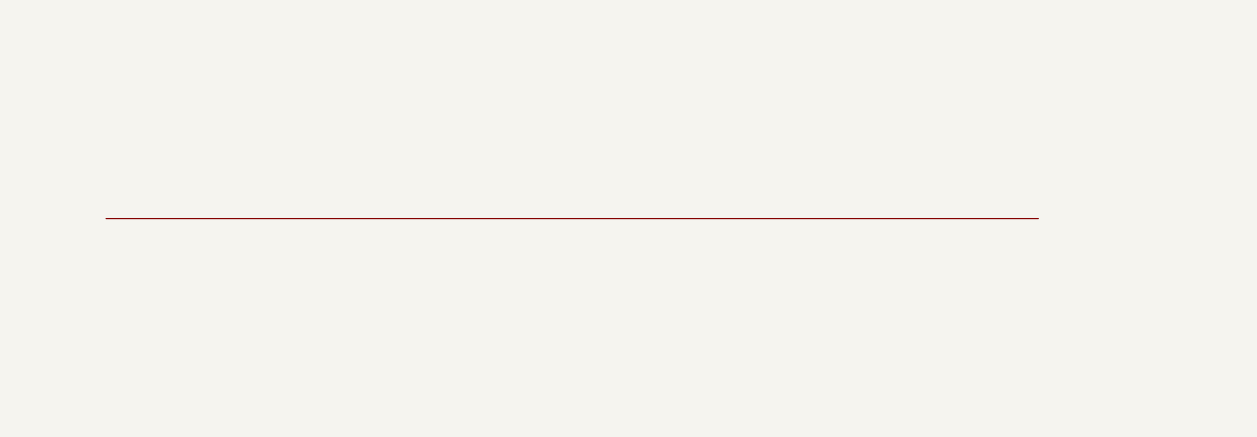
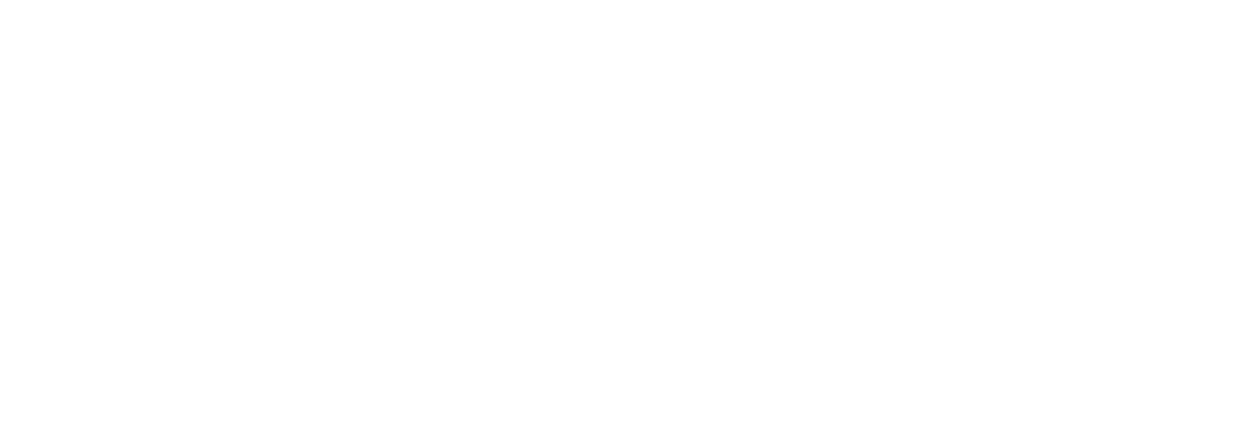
part: (572, 218) -> none

